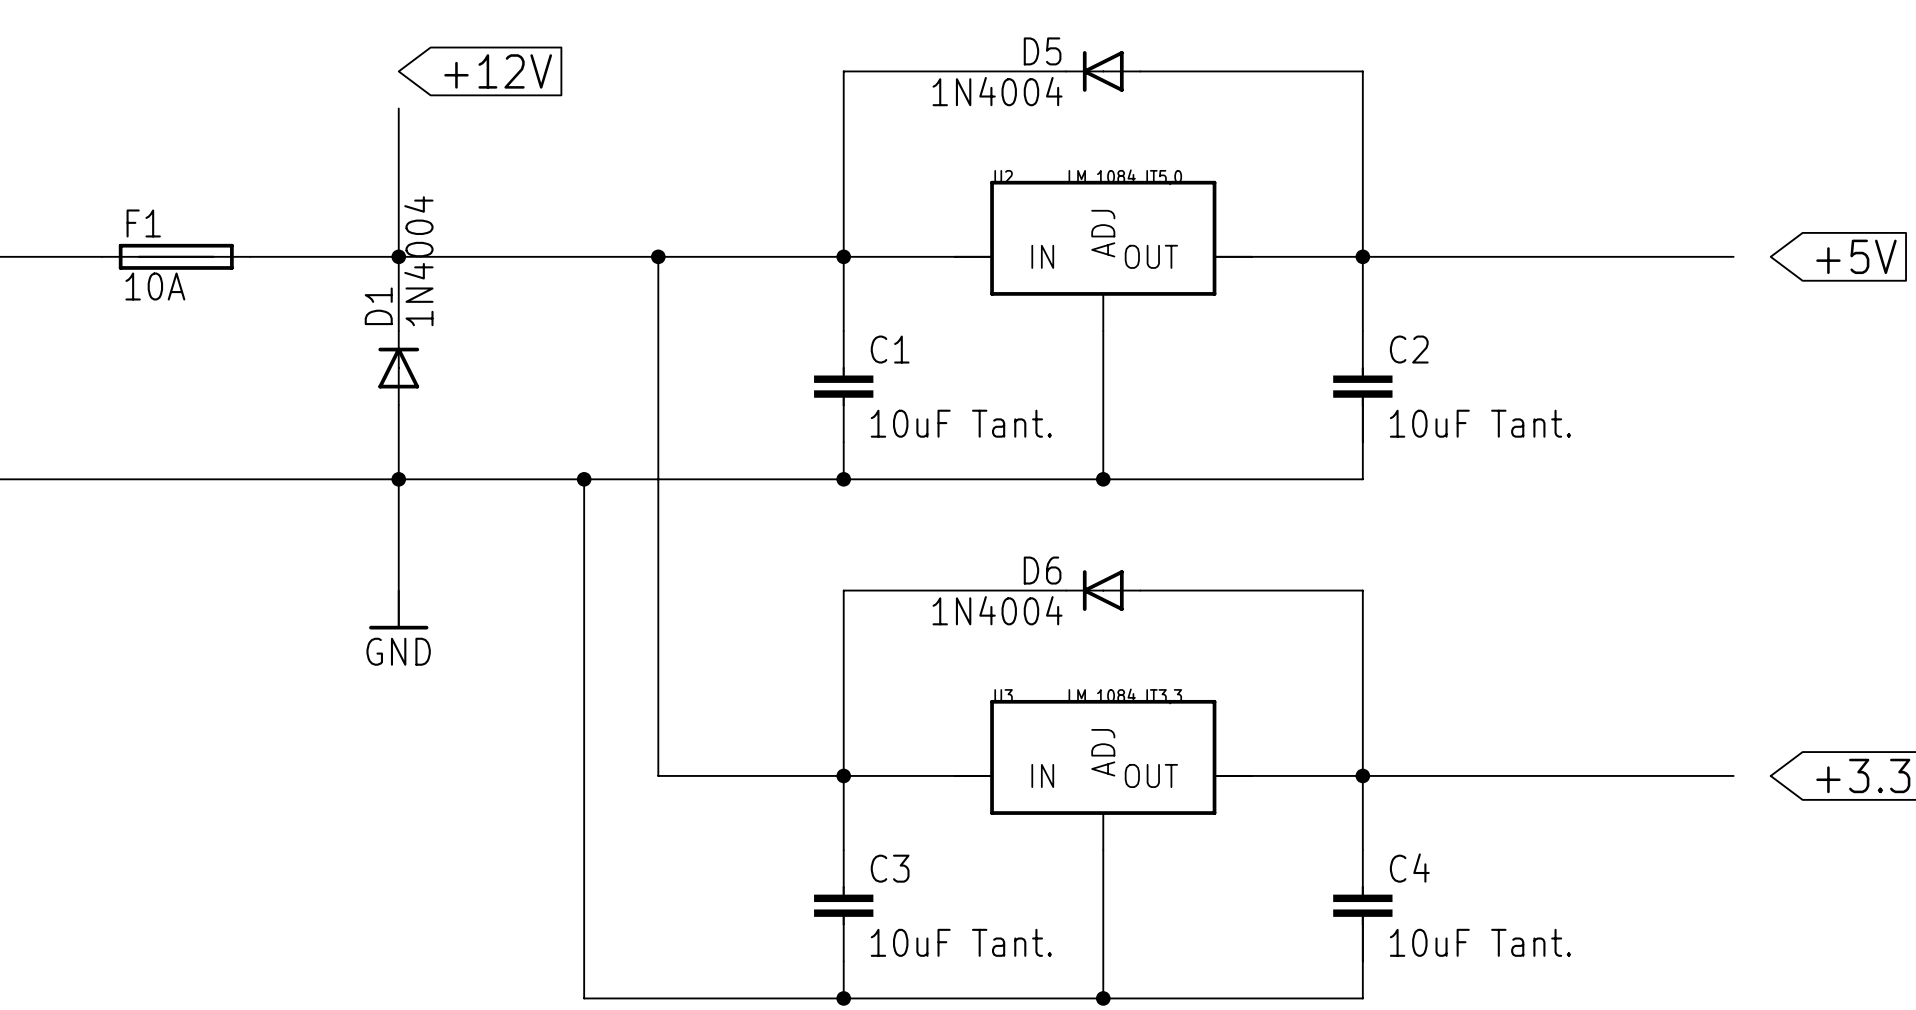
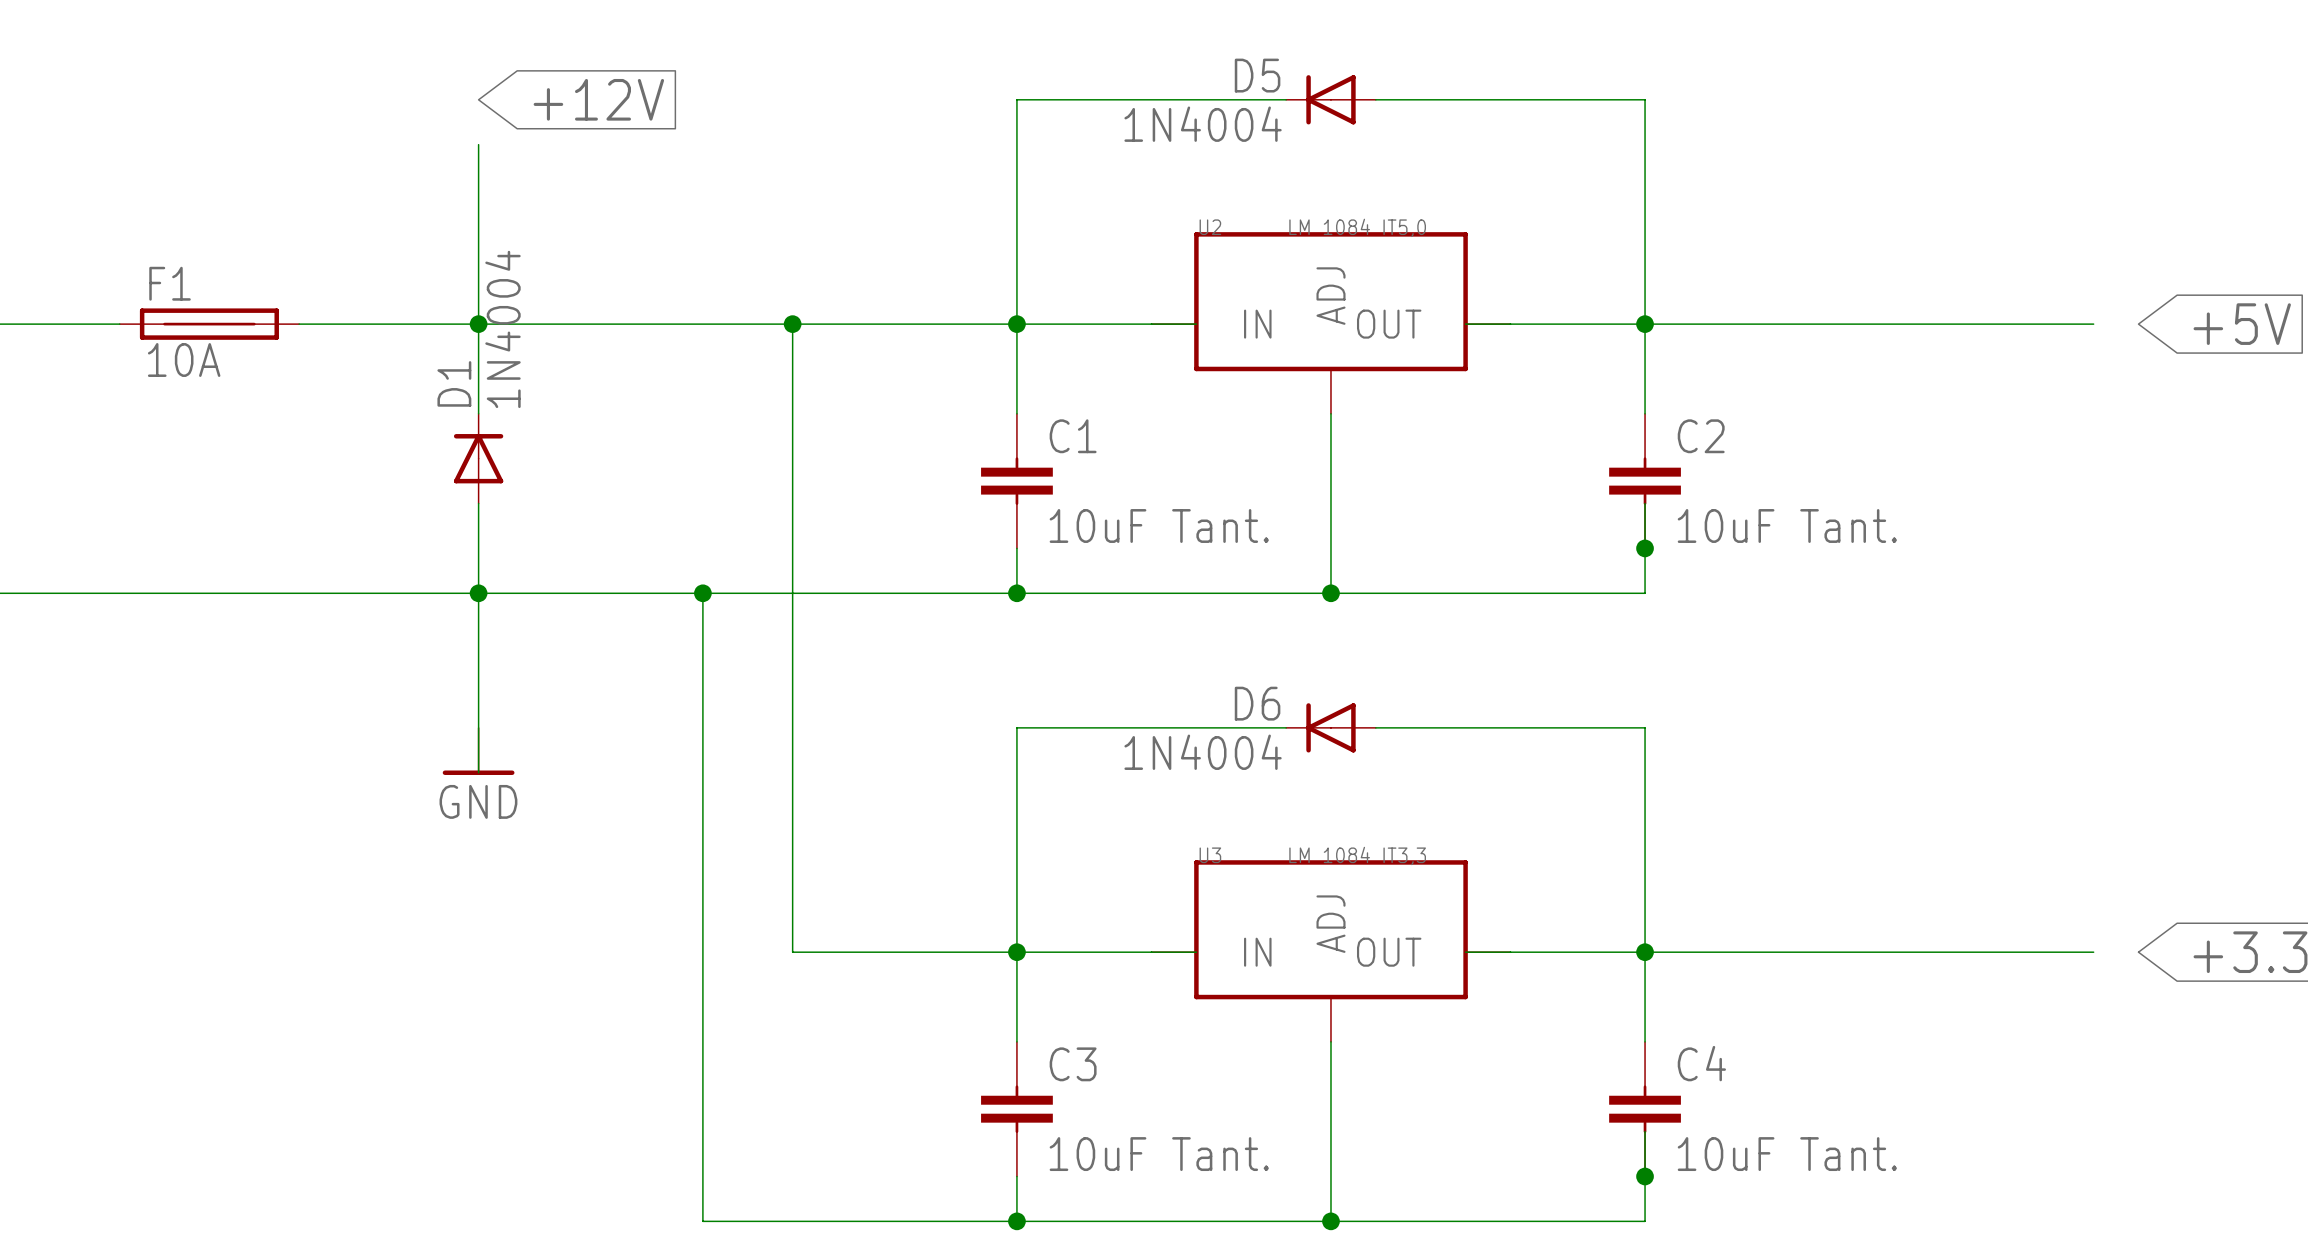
junction: none -> (1645, 548)
junction: none -> (1645, 1176)

